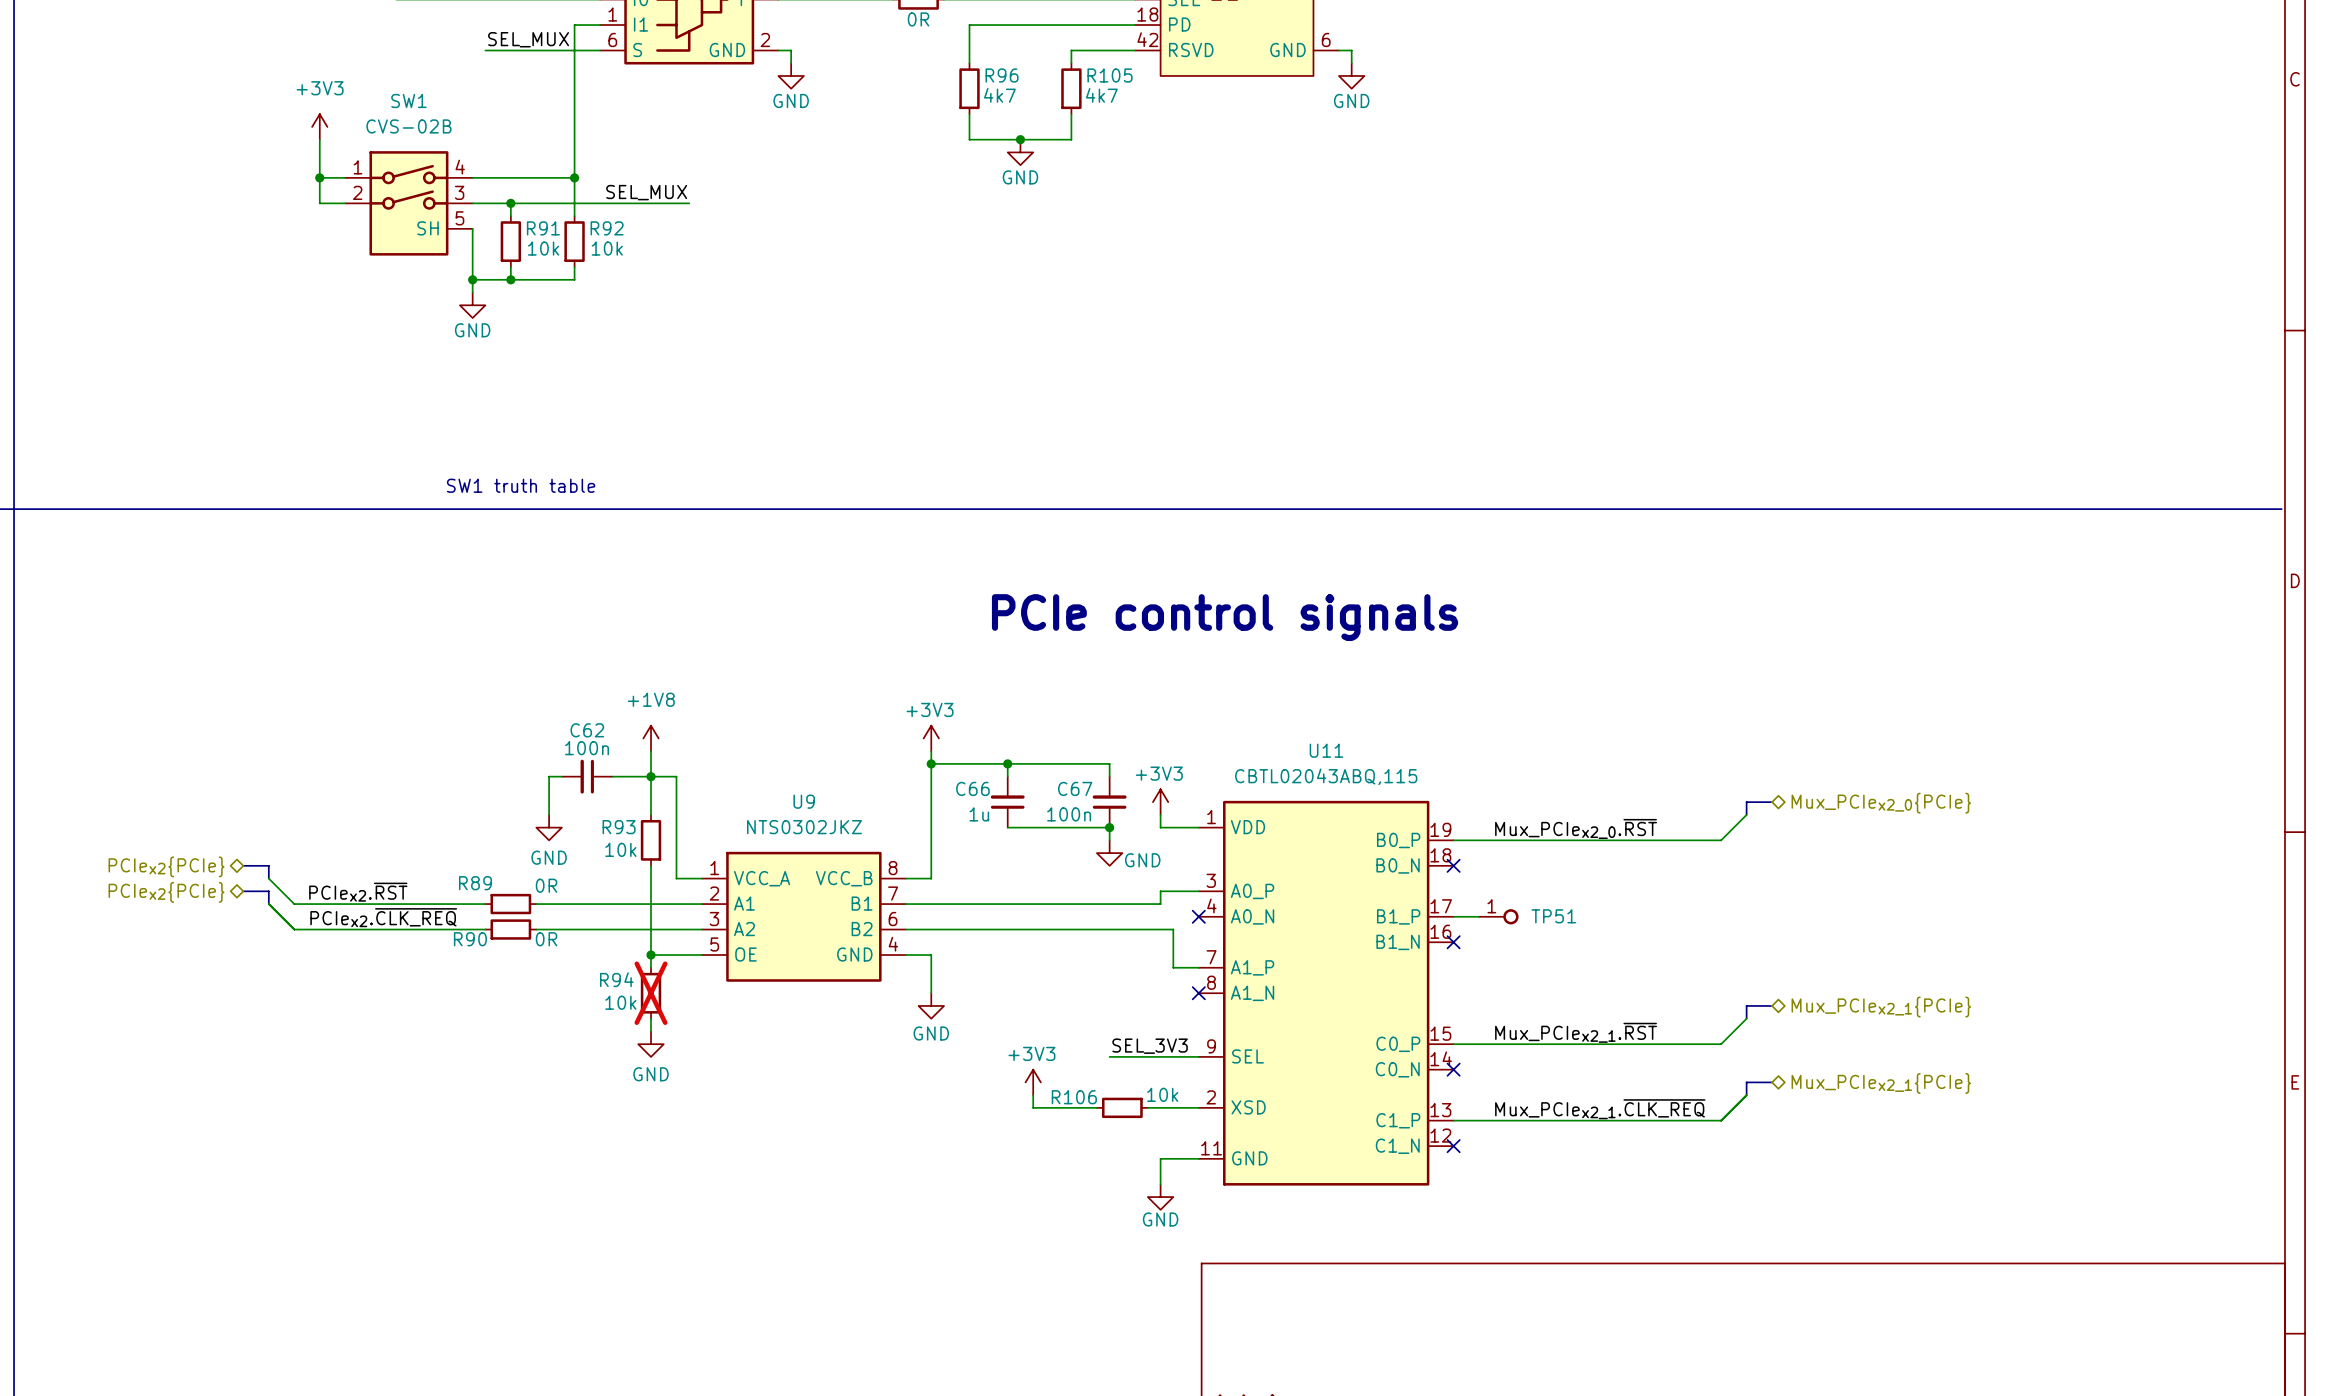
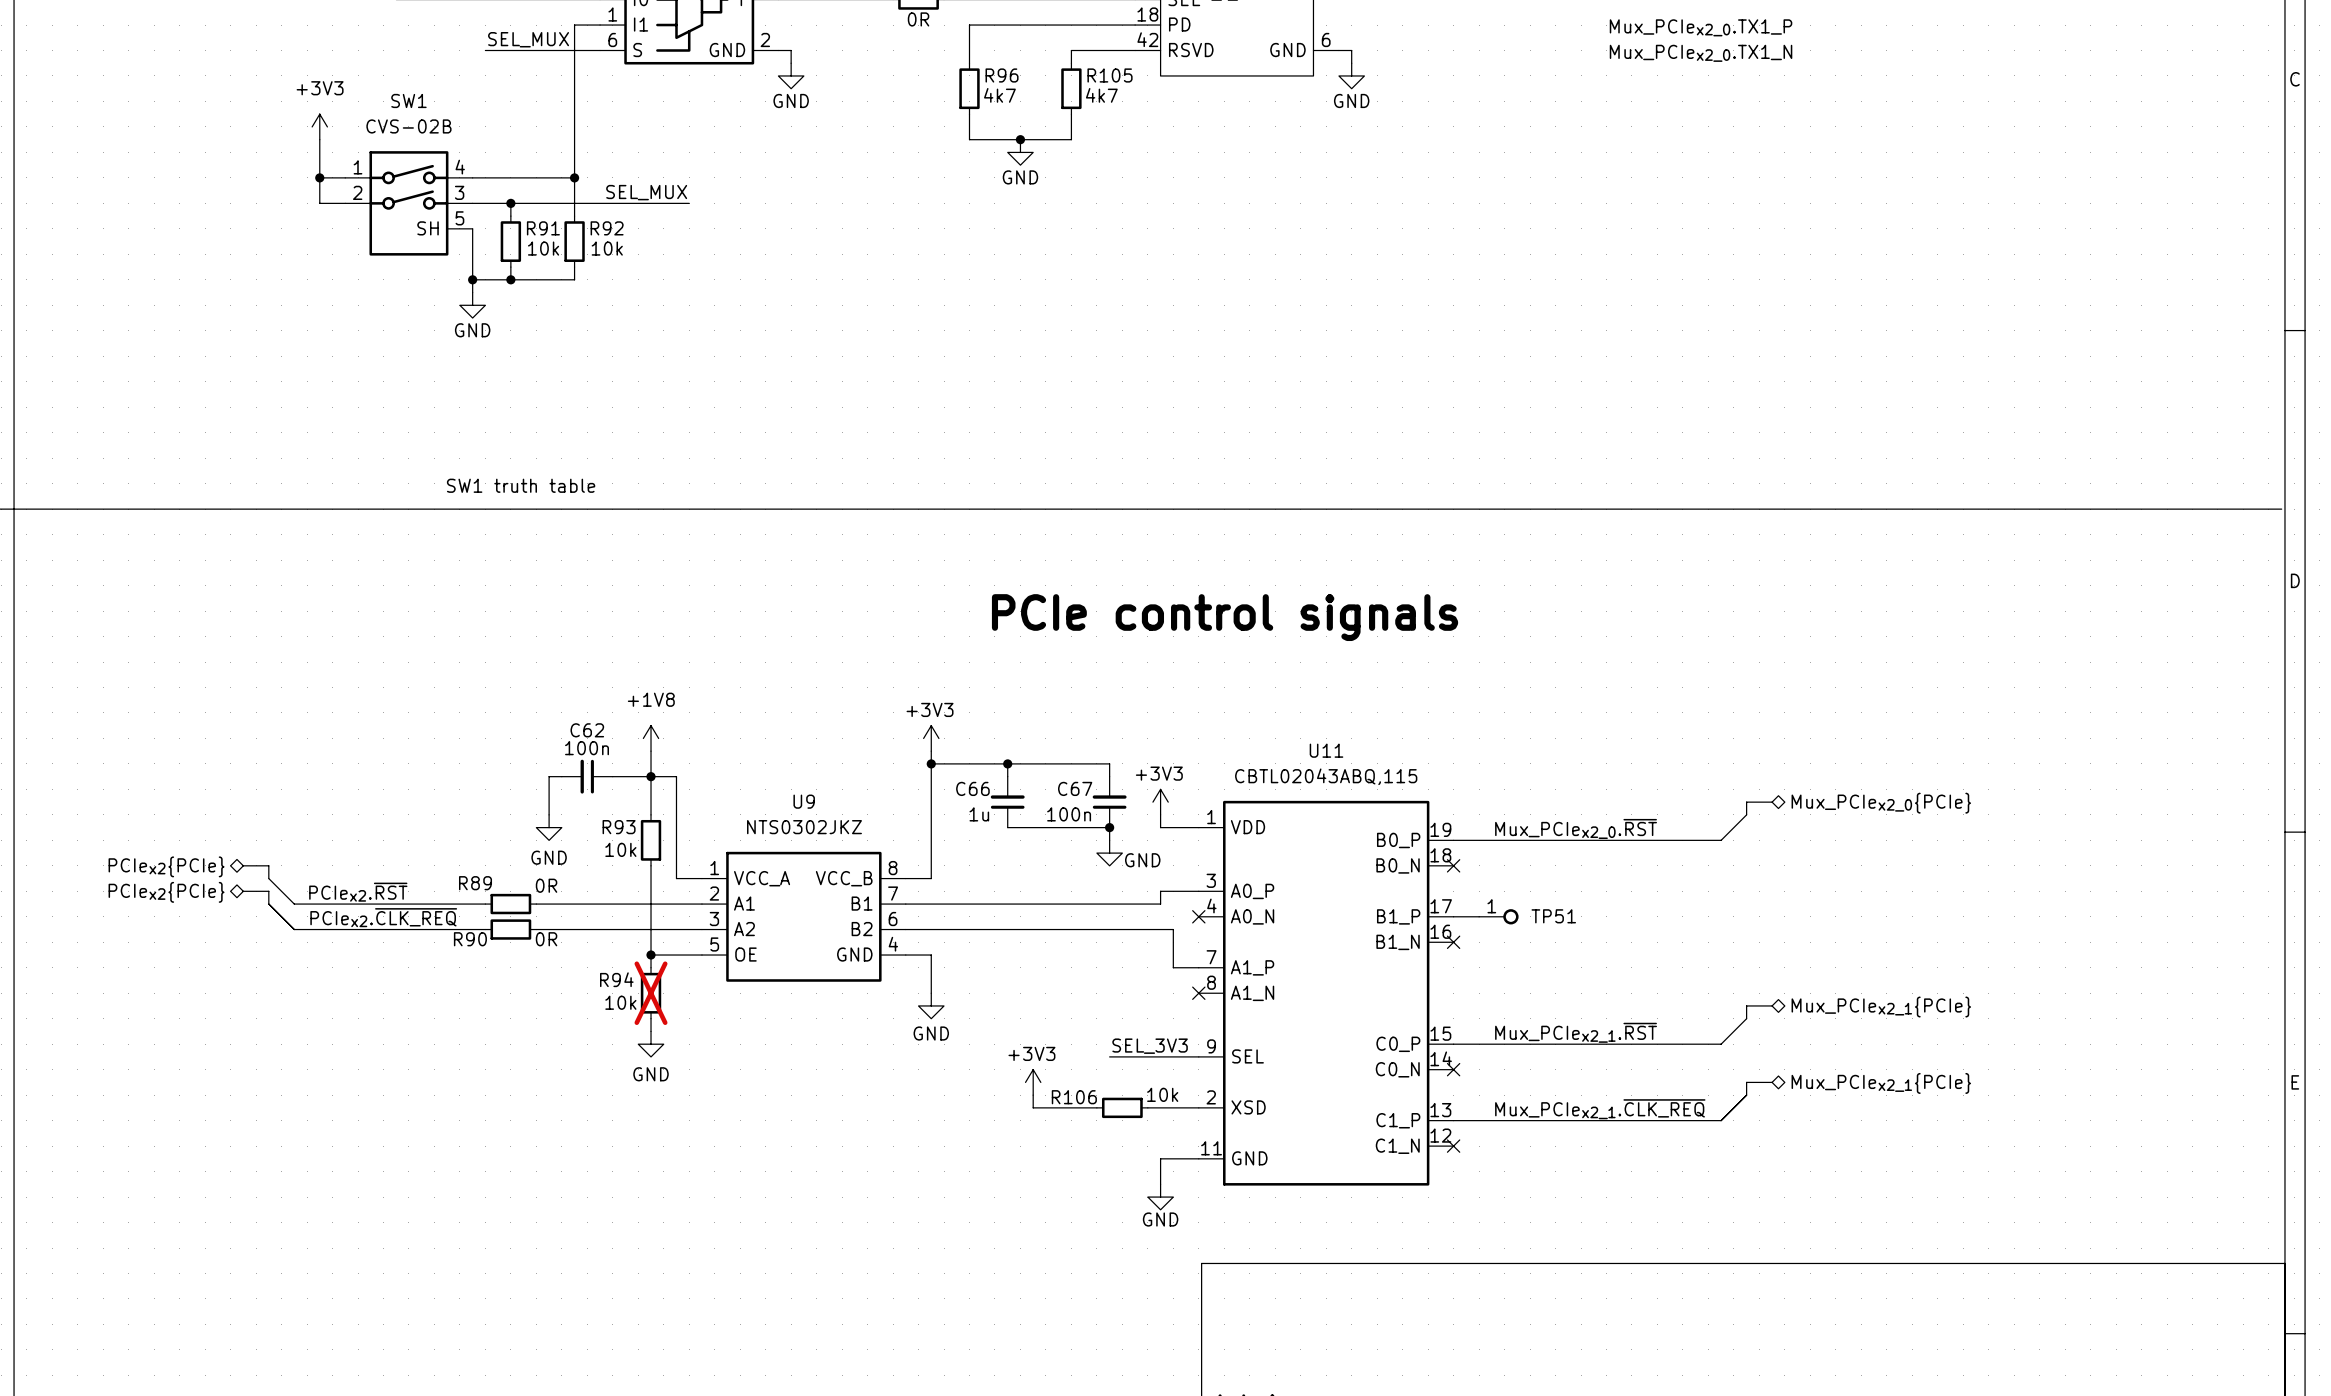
label: none -> Mux_PCIex2_0.TX1_P (1701, 27)
label: none -> Mux_PCIex2_0.TX1_N (1701, 53)

